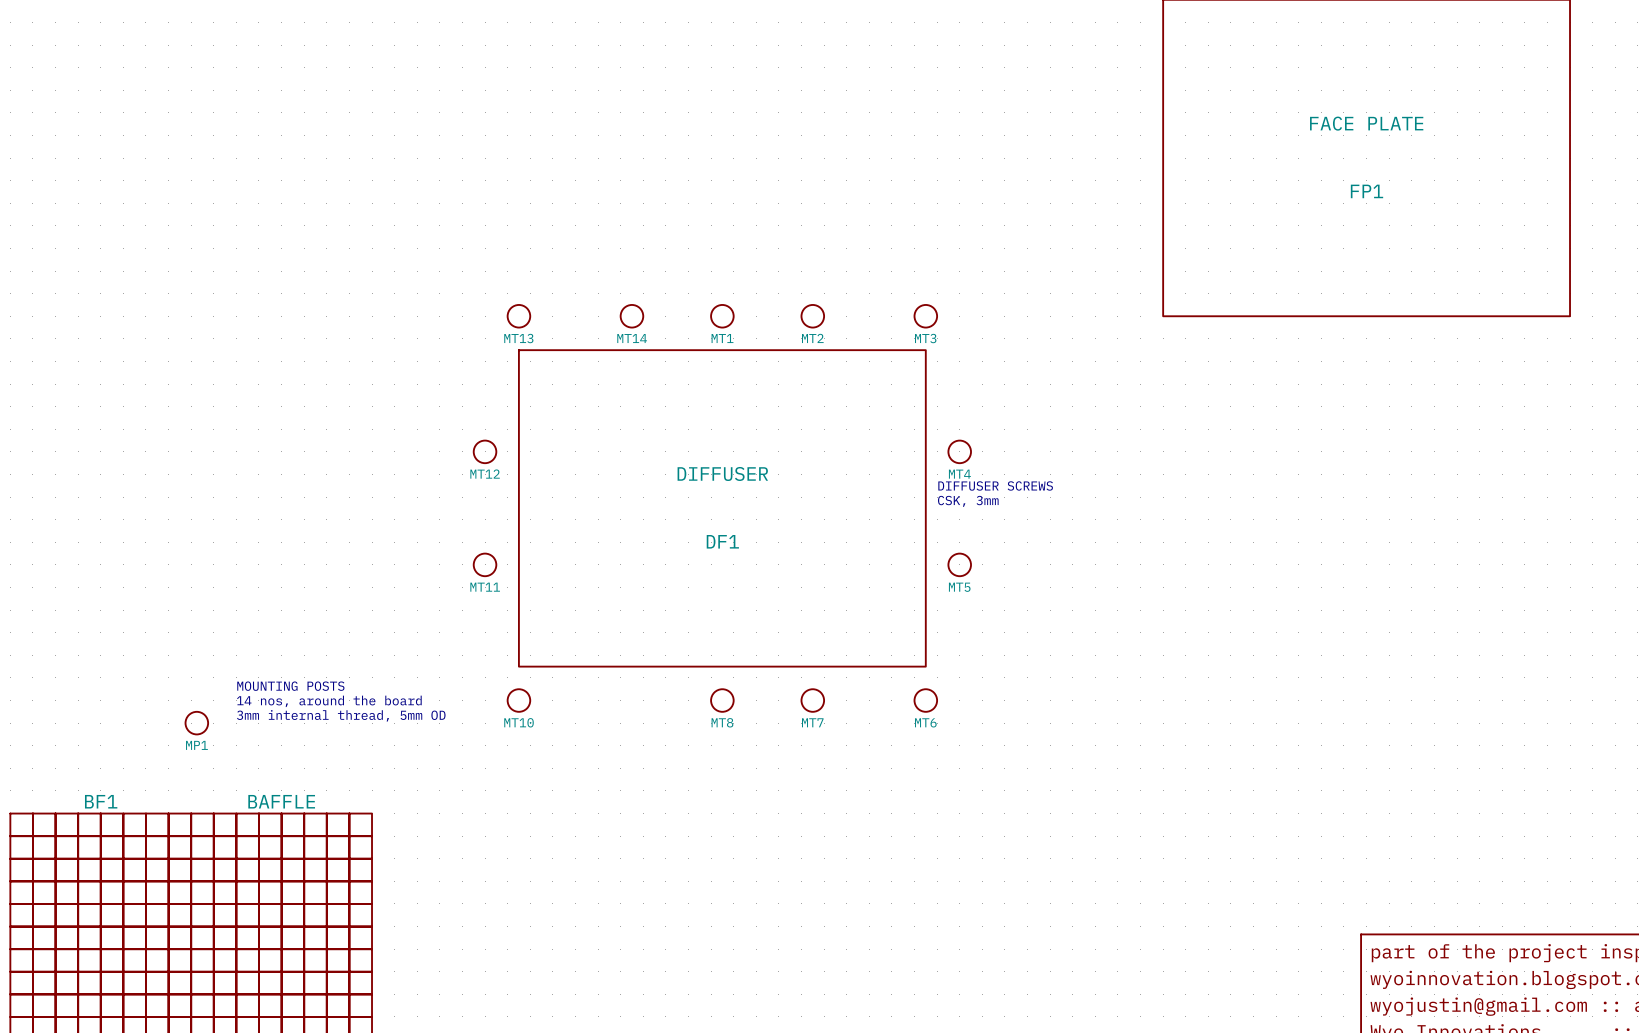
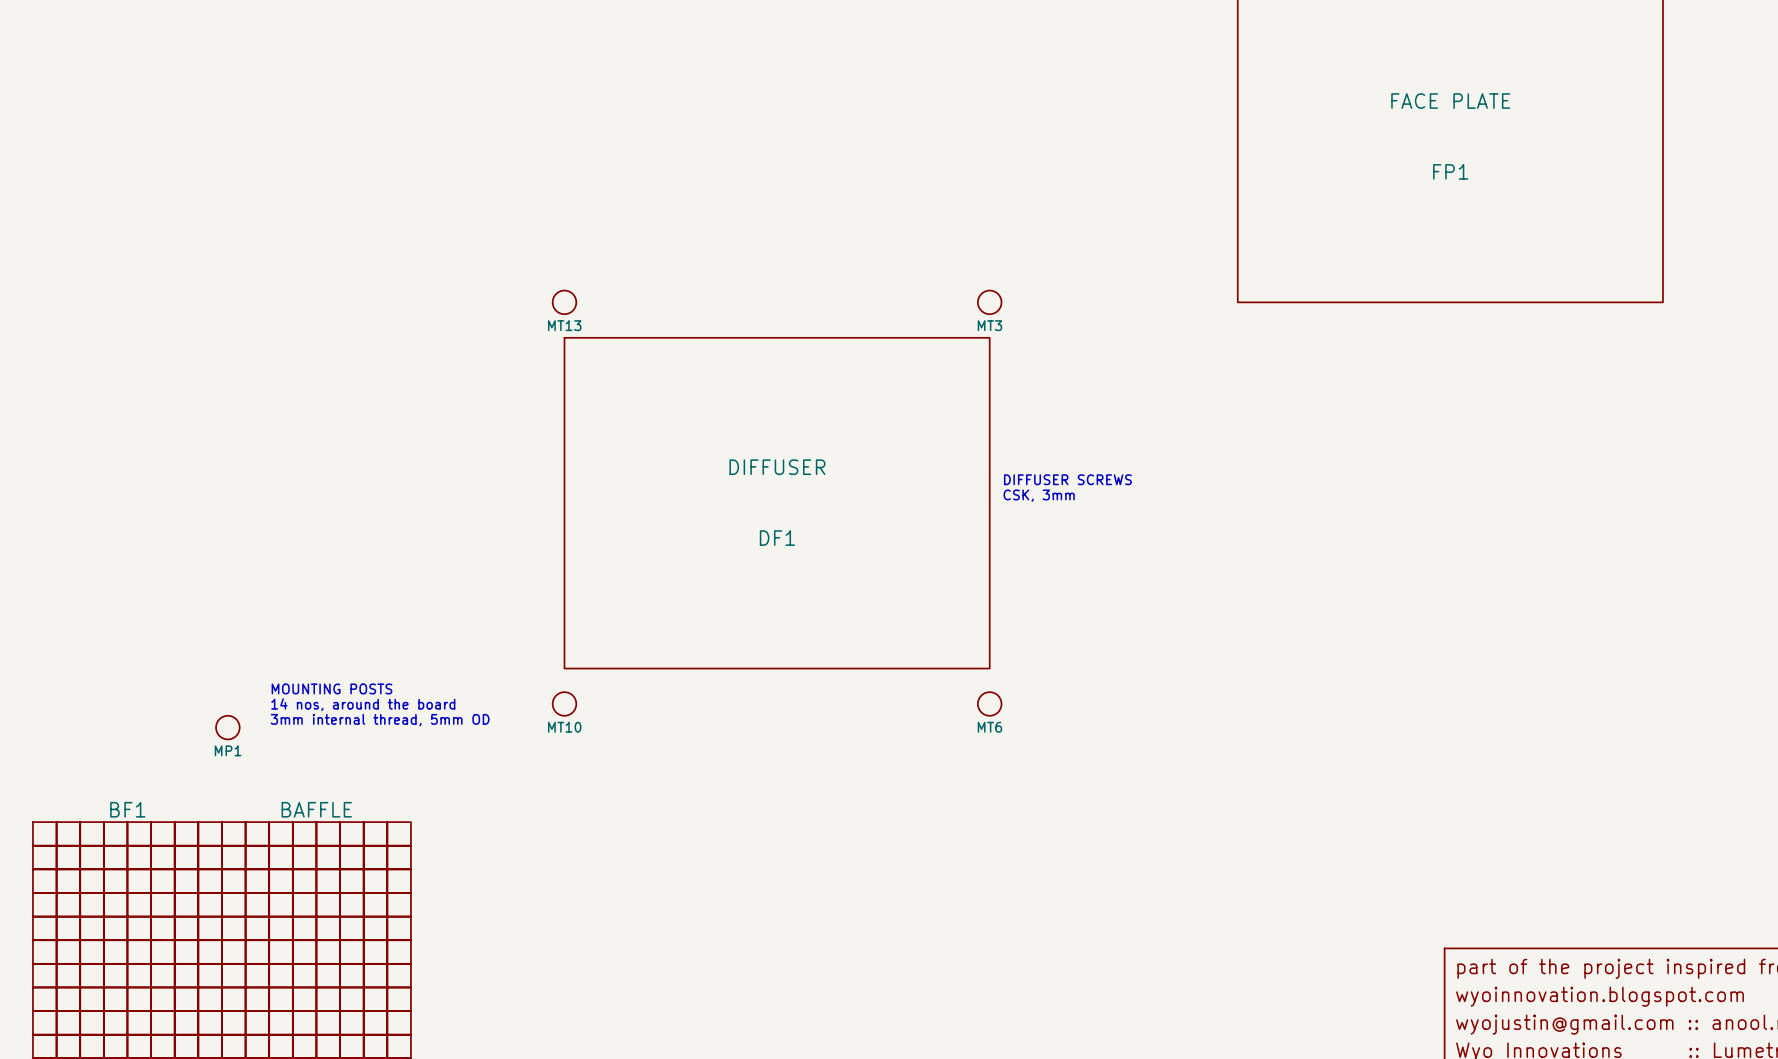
MT14: (631, 316) -> none
MT1: (722, 316) -> none
MT2: (812, 316) -> none
MT12: (485, 451) -> none
MT4: (959, 451) -> none
MT11: (485, 564) -> none
MT5: (959, 564) -> none
MT8: (722, 700) -> none
MT7: (812, 700) -> none

